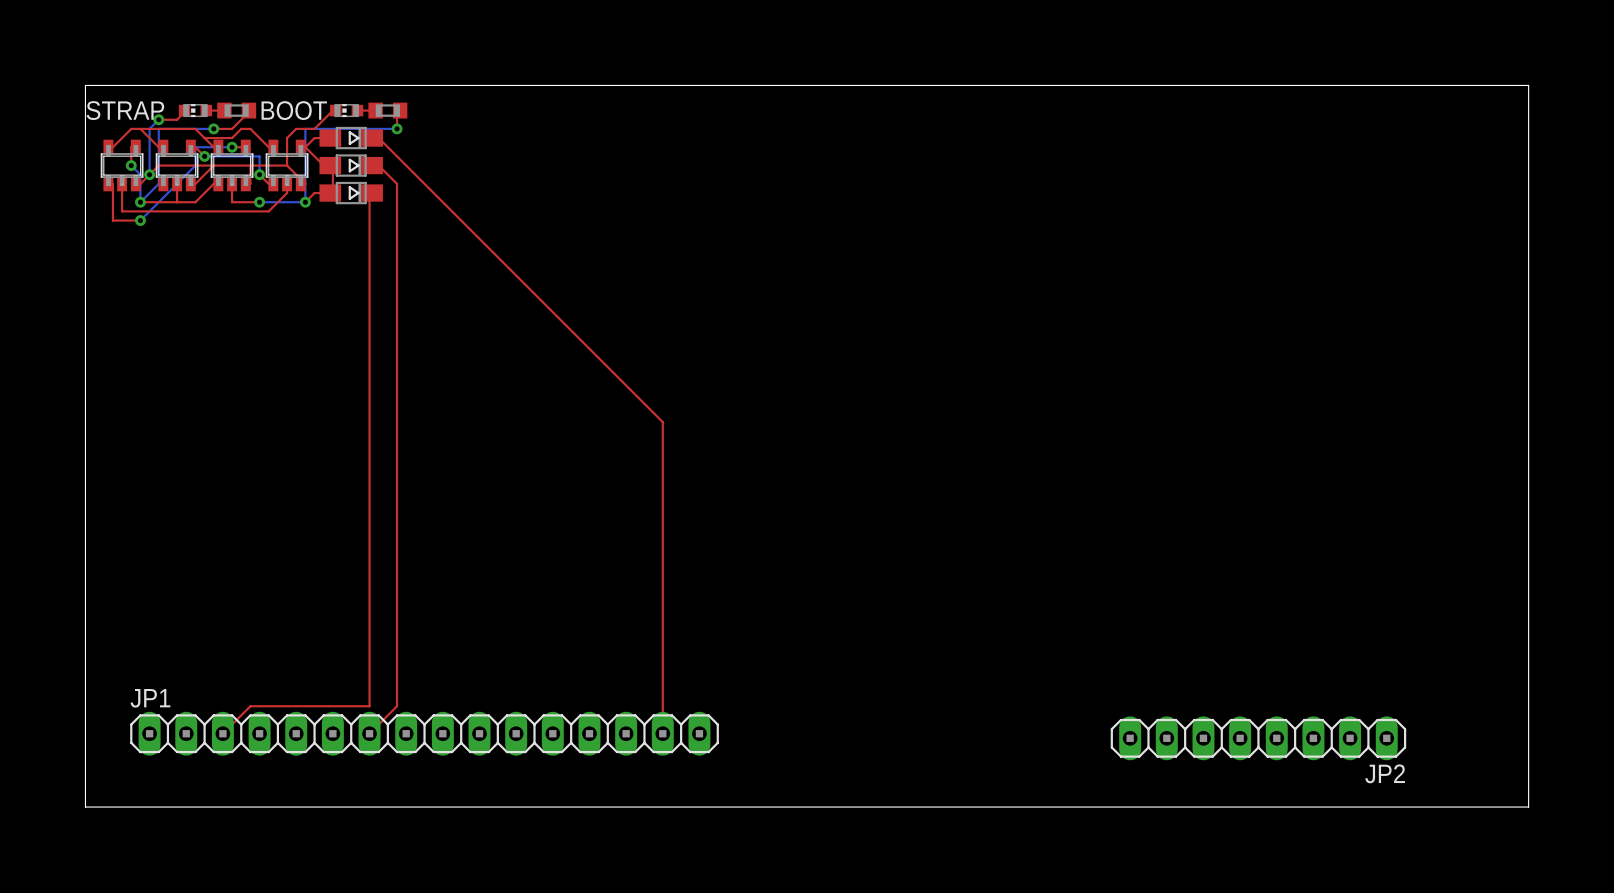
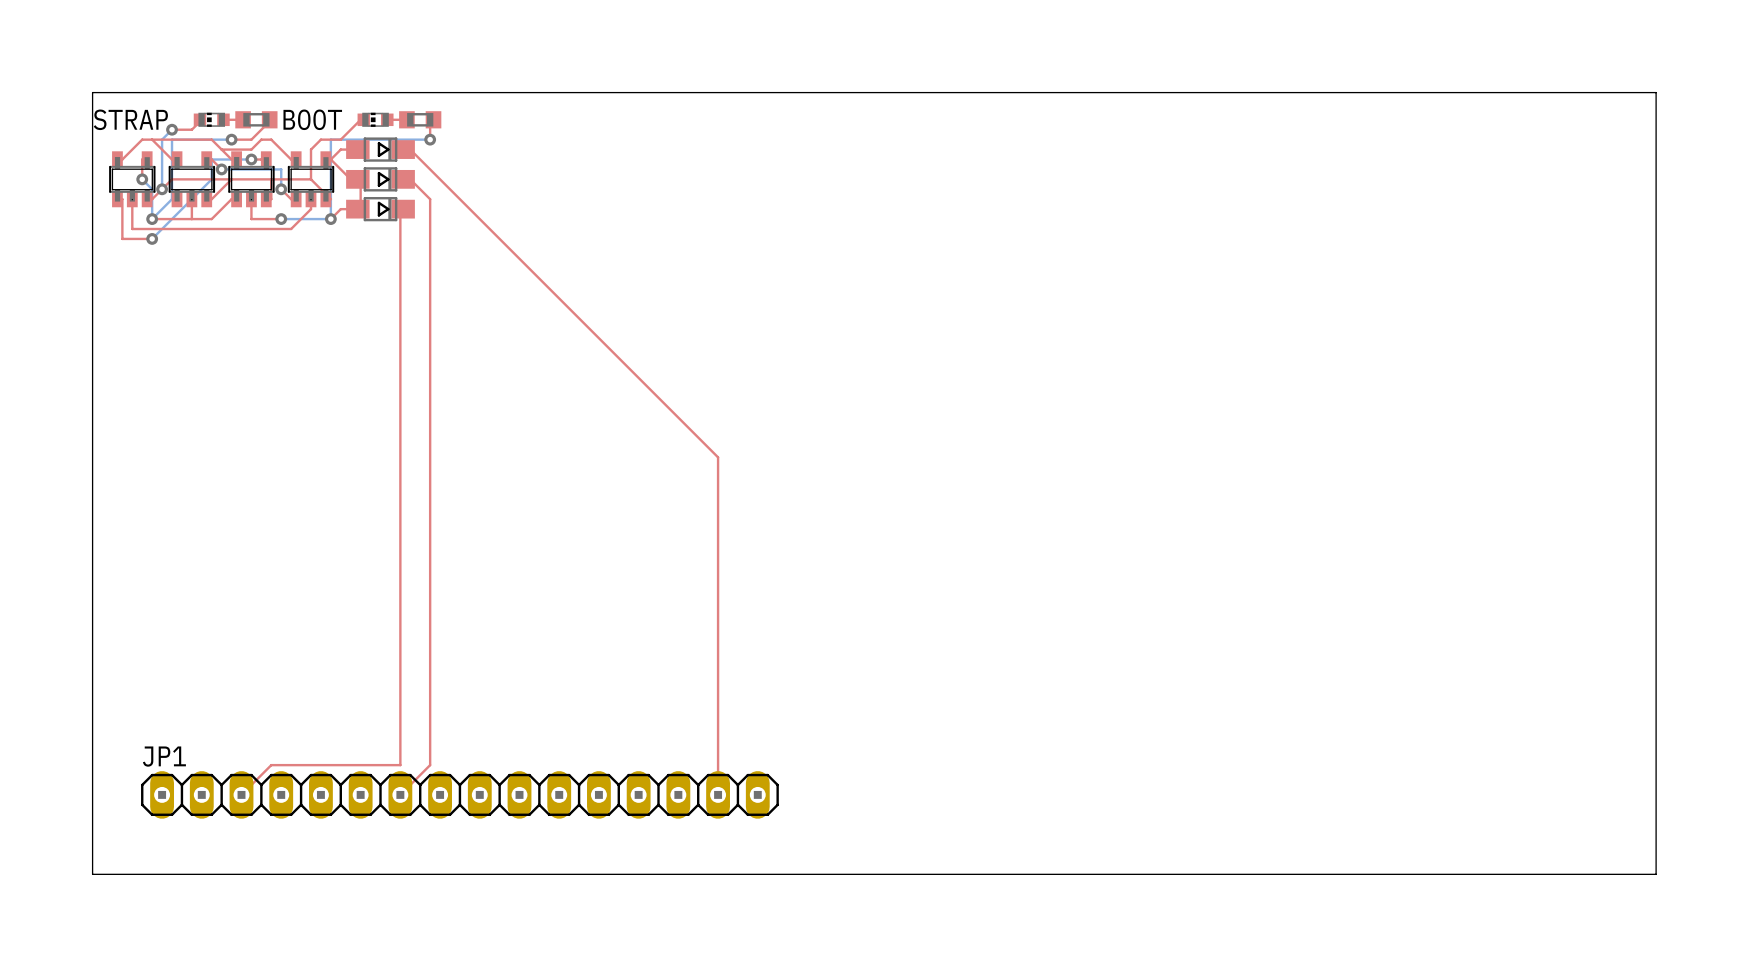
JP2: (1258, 738) -> none

